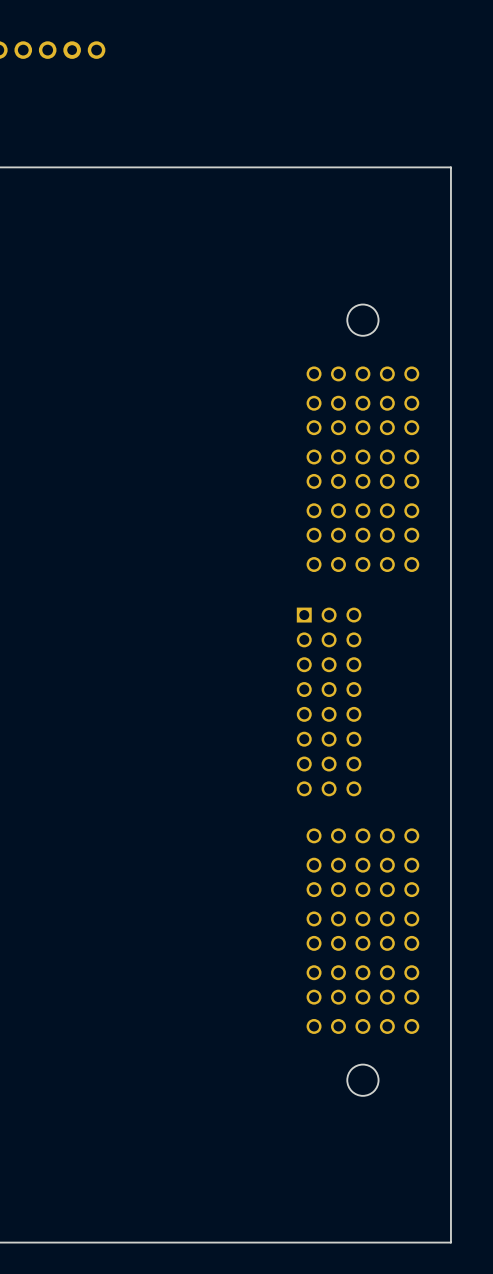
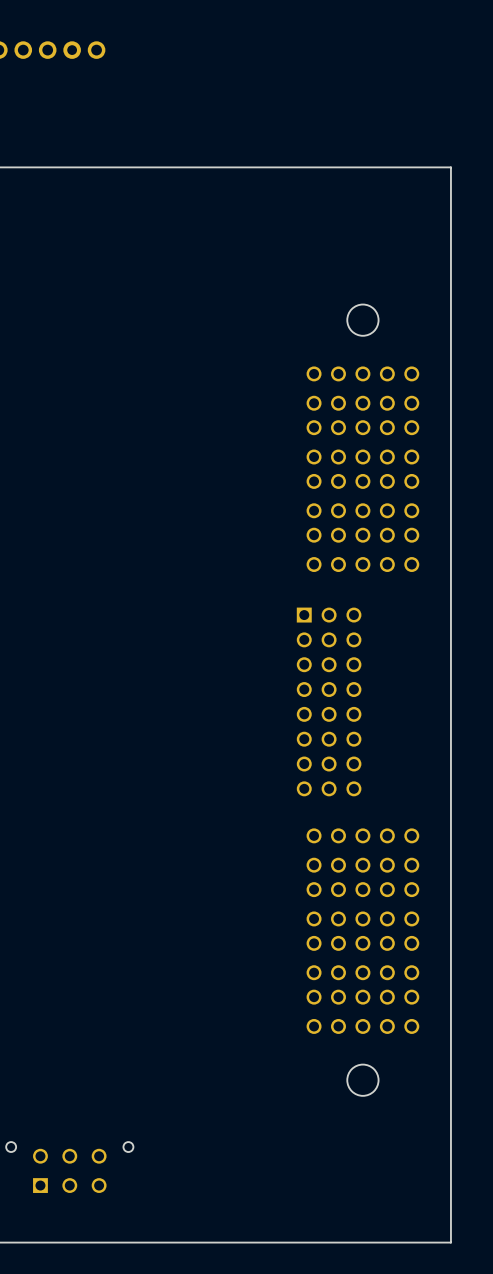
part: none -> (69, 1167)

